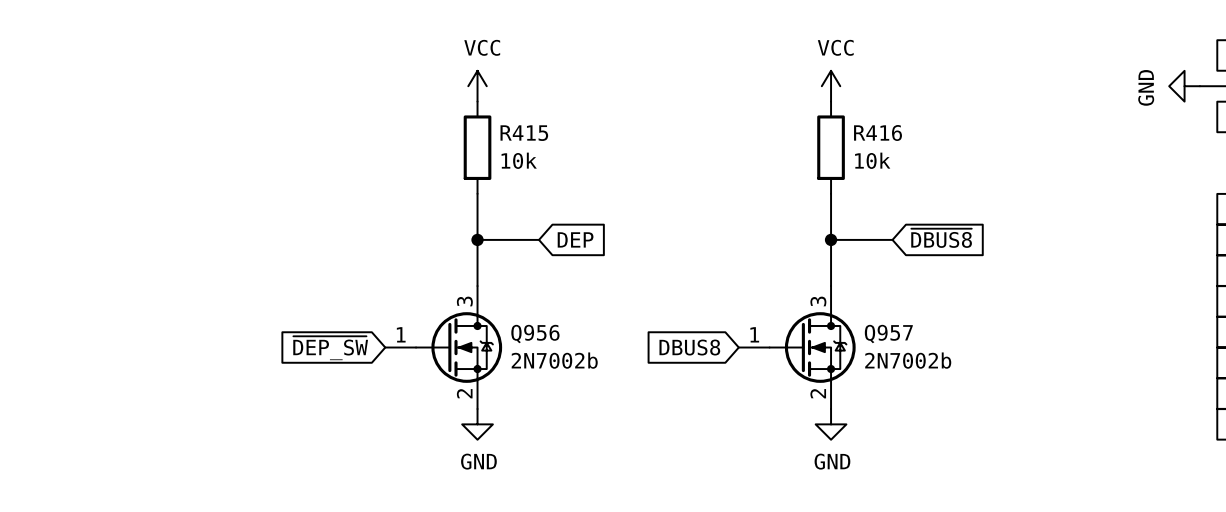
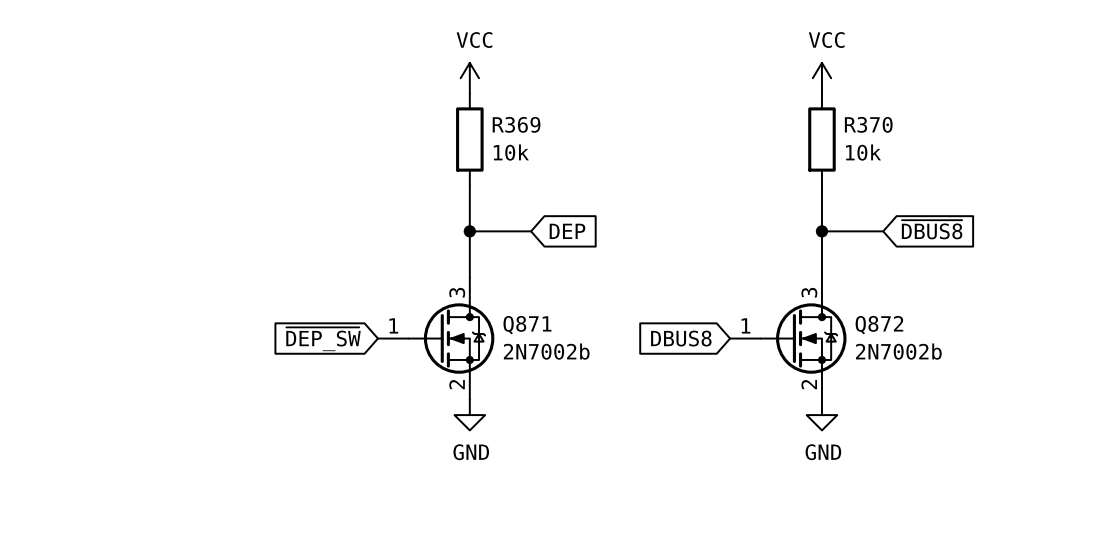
R416 name: R416 (878, 132) -> R370 (868, 124)
R415 name: R415 (524, 133) -> R369 (516, 124)
Q956 name: Q956 (535, 334) -> Q871 (527, 325)
Q957 name: Q957 (888, 334) -> Q872 (879, 325)

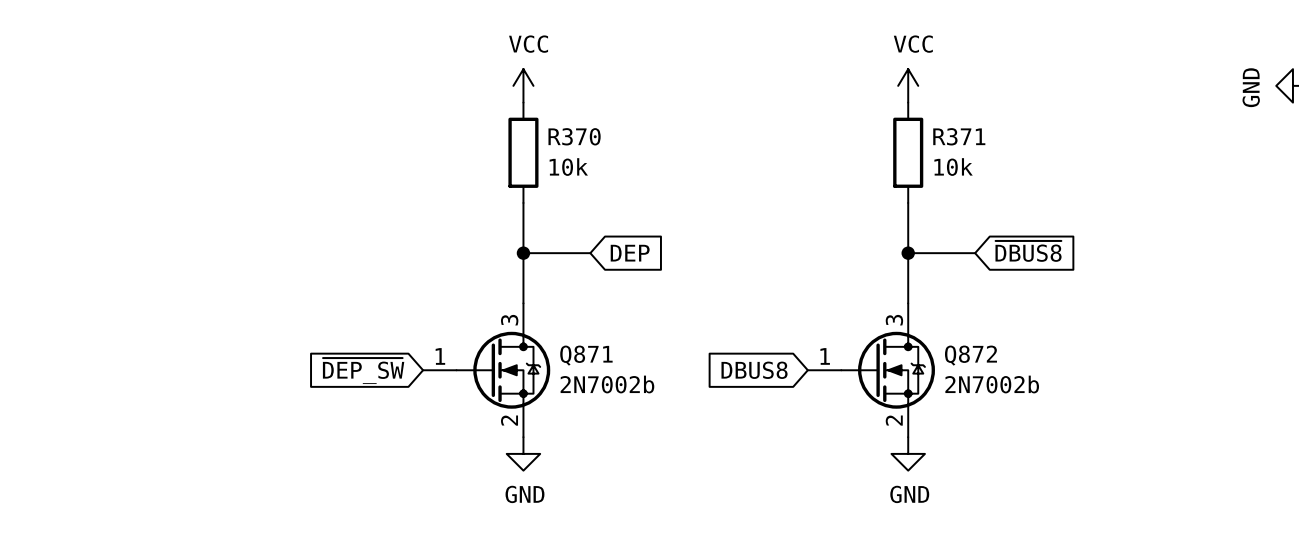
R369 name: R369 (516, 124) -> R370 (574, 136)
R370 name: R370 (868, 124) -> R371 (959, 136)

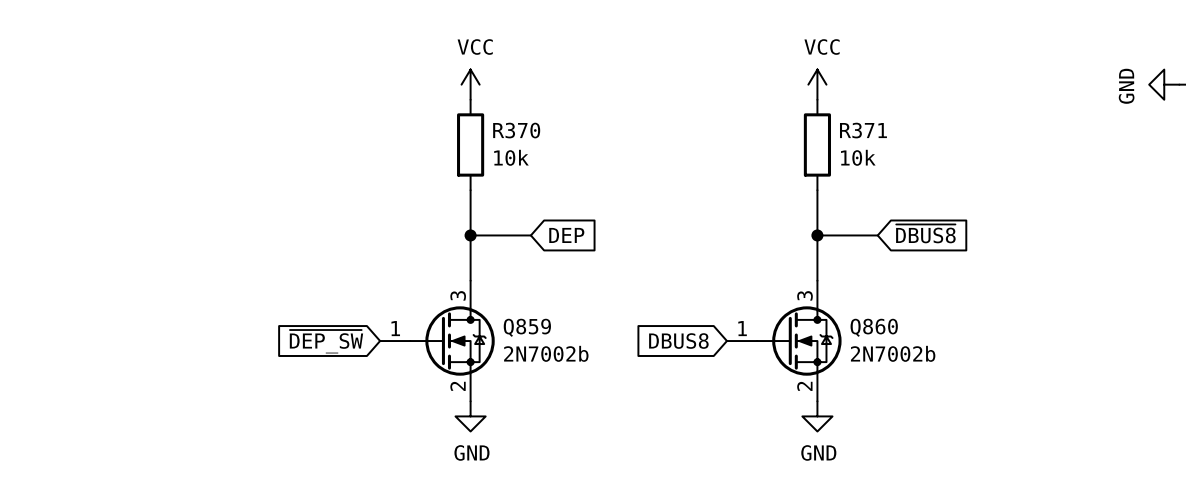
Q871 name: Q871 (586, 355) -> Q859 (527, 327)
Q872 name: Q872 (970, 355) -> Q860 (874, 327)

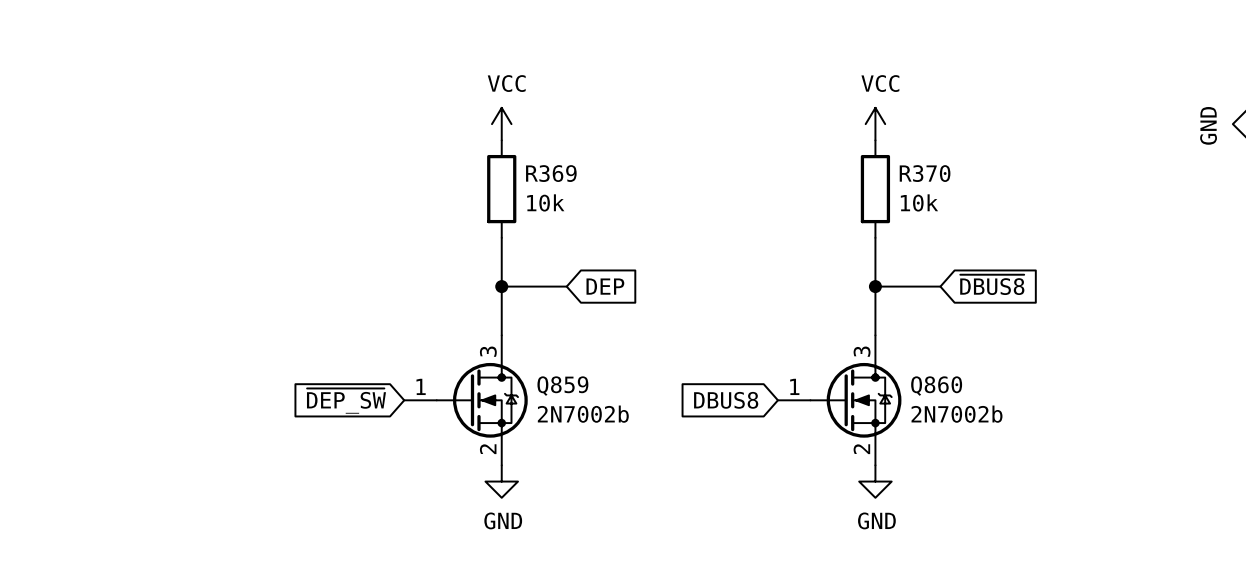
R370 name: R370 (516, 130) -> R369 (551, 173)
R371 name: R371 (863, 130) -> R370 (925, 173)

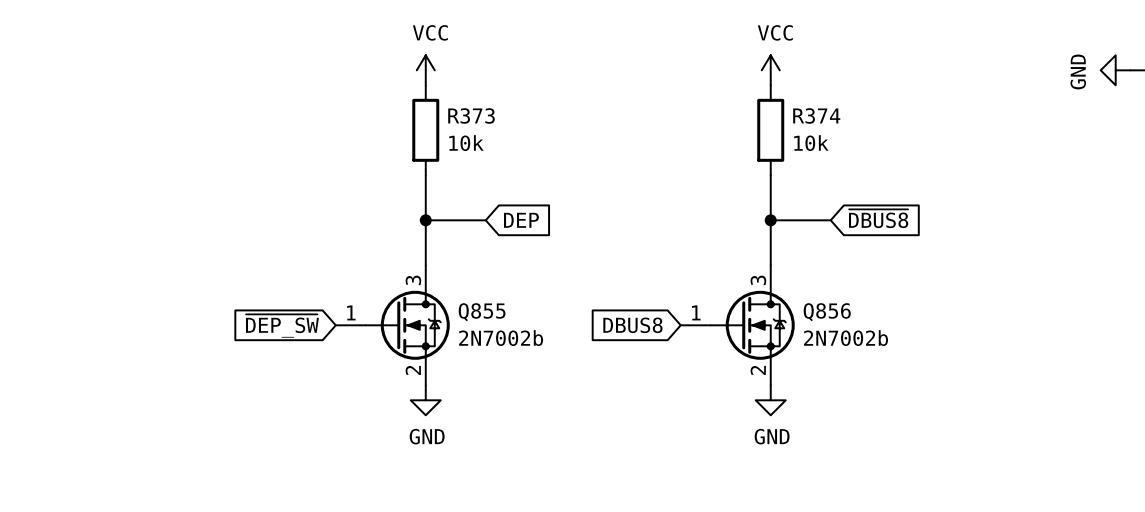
R369 name: R369 (551, 173) -> R373 (471, 115)
R370 name: R370 (925, 173) -> R374 (816, 115)
Q859 name: Q859 (562, 386) -> Q855 (482, 312)
Q860 name: Q860 (936, 386) -> Q856 (827, 312)

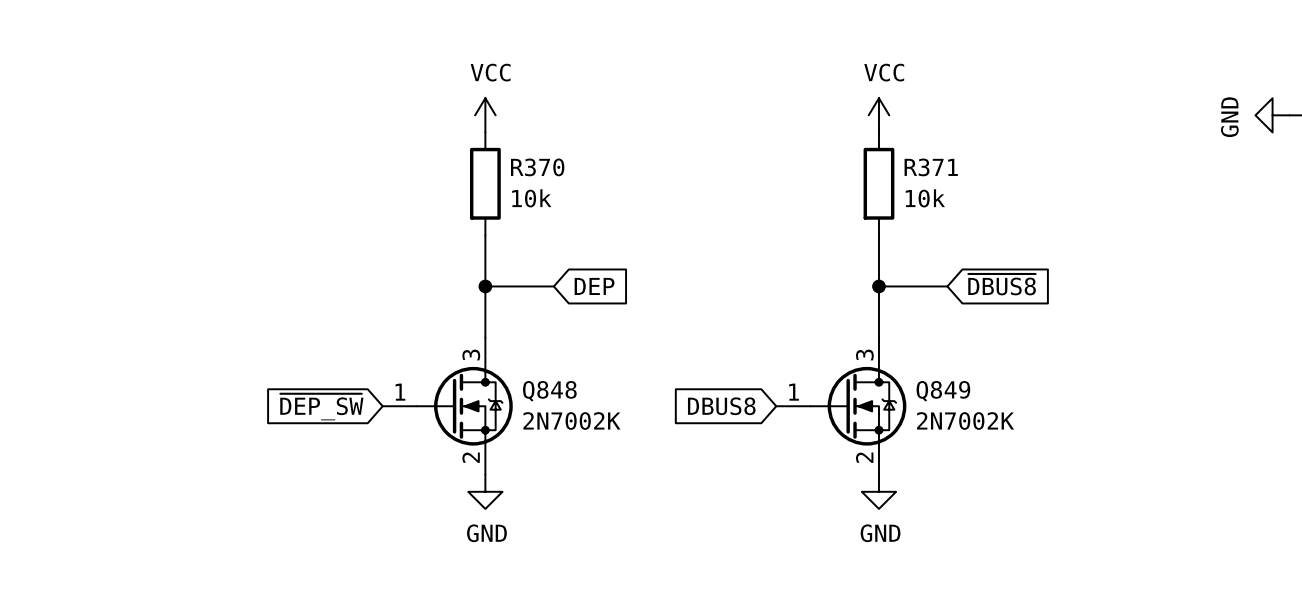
R373 name: R373 (471, 115) -> R370 (537, 167)
R374 name: R374 (816, 115) -> R371 (931, 167)
Q855 name: Q855 (482, 312) -> Q848 (549, 391)
Q856 name: Q856 (827, 312) -> Q849 (943, 391)
Q855 value: 2N7002b (501, 338) -> 2N7002K (571, 421)
Q856 value: 2N7002b (846, 338) -> 2N7002K (965, 421)

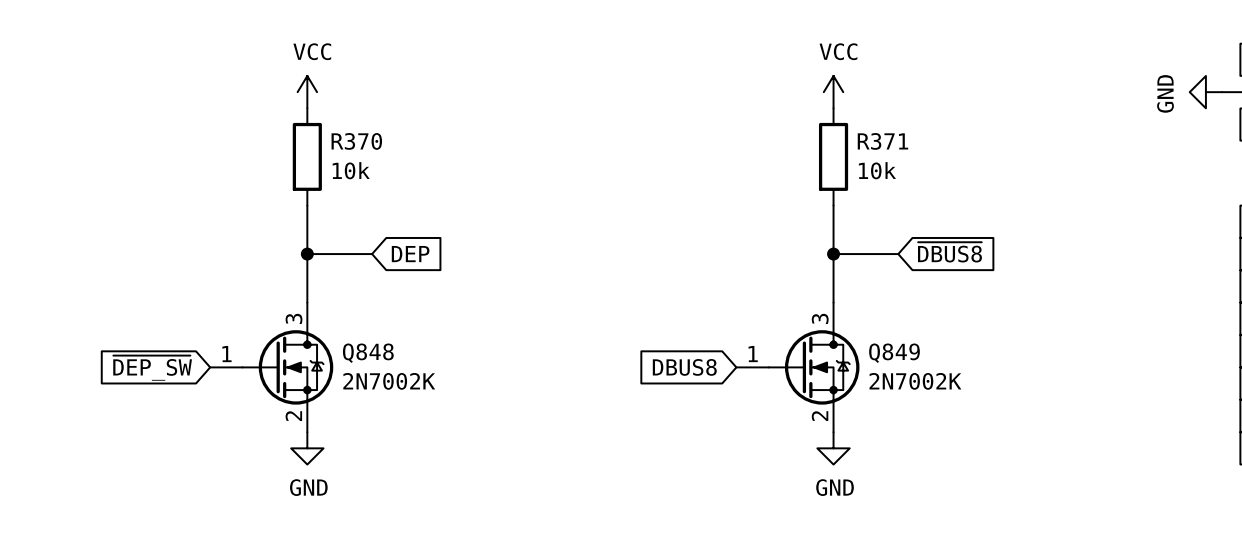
power symbol position: VCC (485, 115) -> VCC (307, 92)
R370 position: (485, 183) -> (307, 156)
wire: (485, 235) (485, 337) -> (307, 205) (307, 302)
junction: none -> (307, 254)
wire: (485, 286) (553, 286) -> (307, 254) (372, 254)
junction: (485, 286) -> none
global label position: DEP (594, 286) -> DEP (410, 254)
Q848 position: (447, 406) -> (271, 367)
global label position: ~{DEP_SW} (321, 407) -> ~{DEP_SW} (152, 368)
power symbol position: GND (485, 491) -> GND (307, 448)

